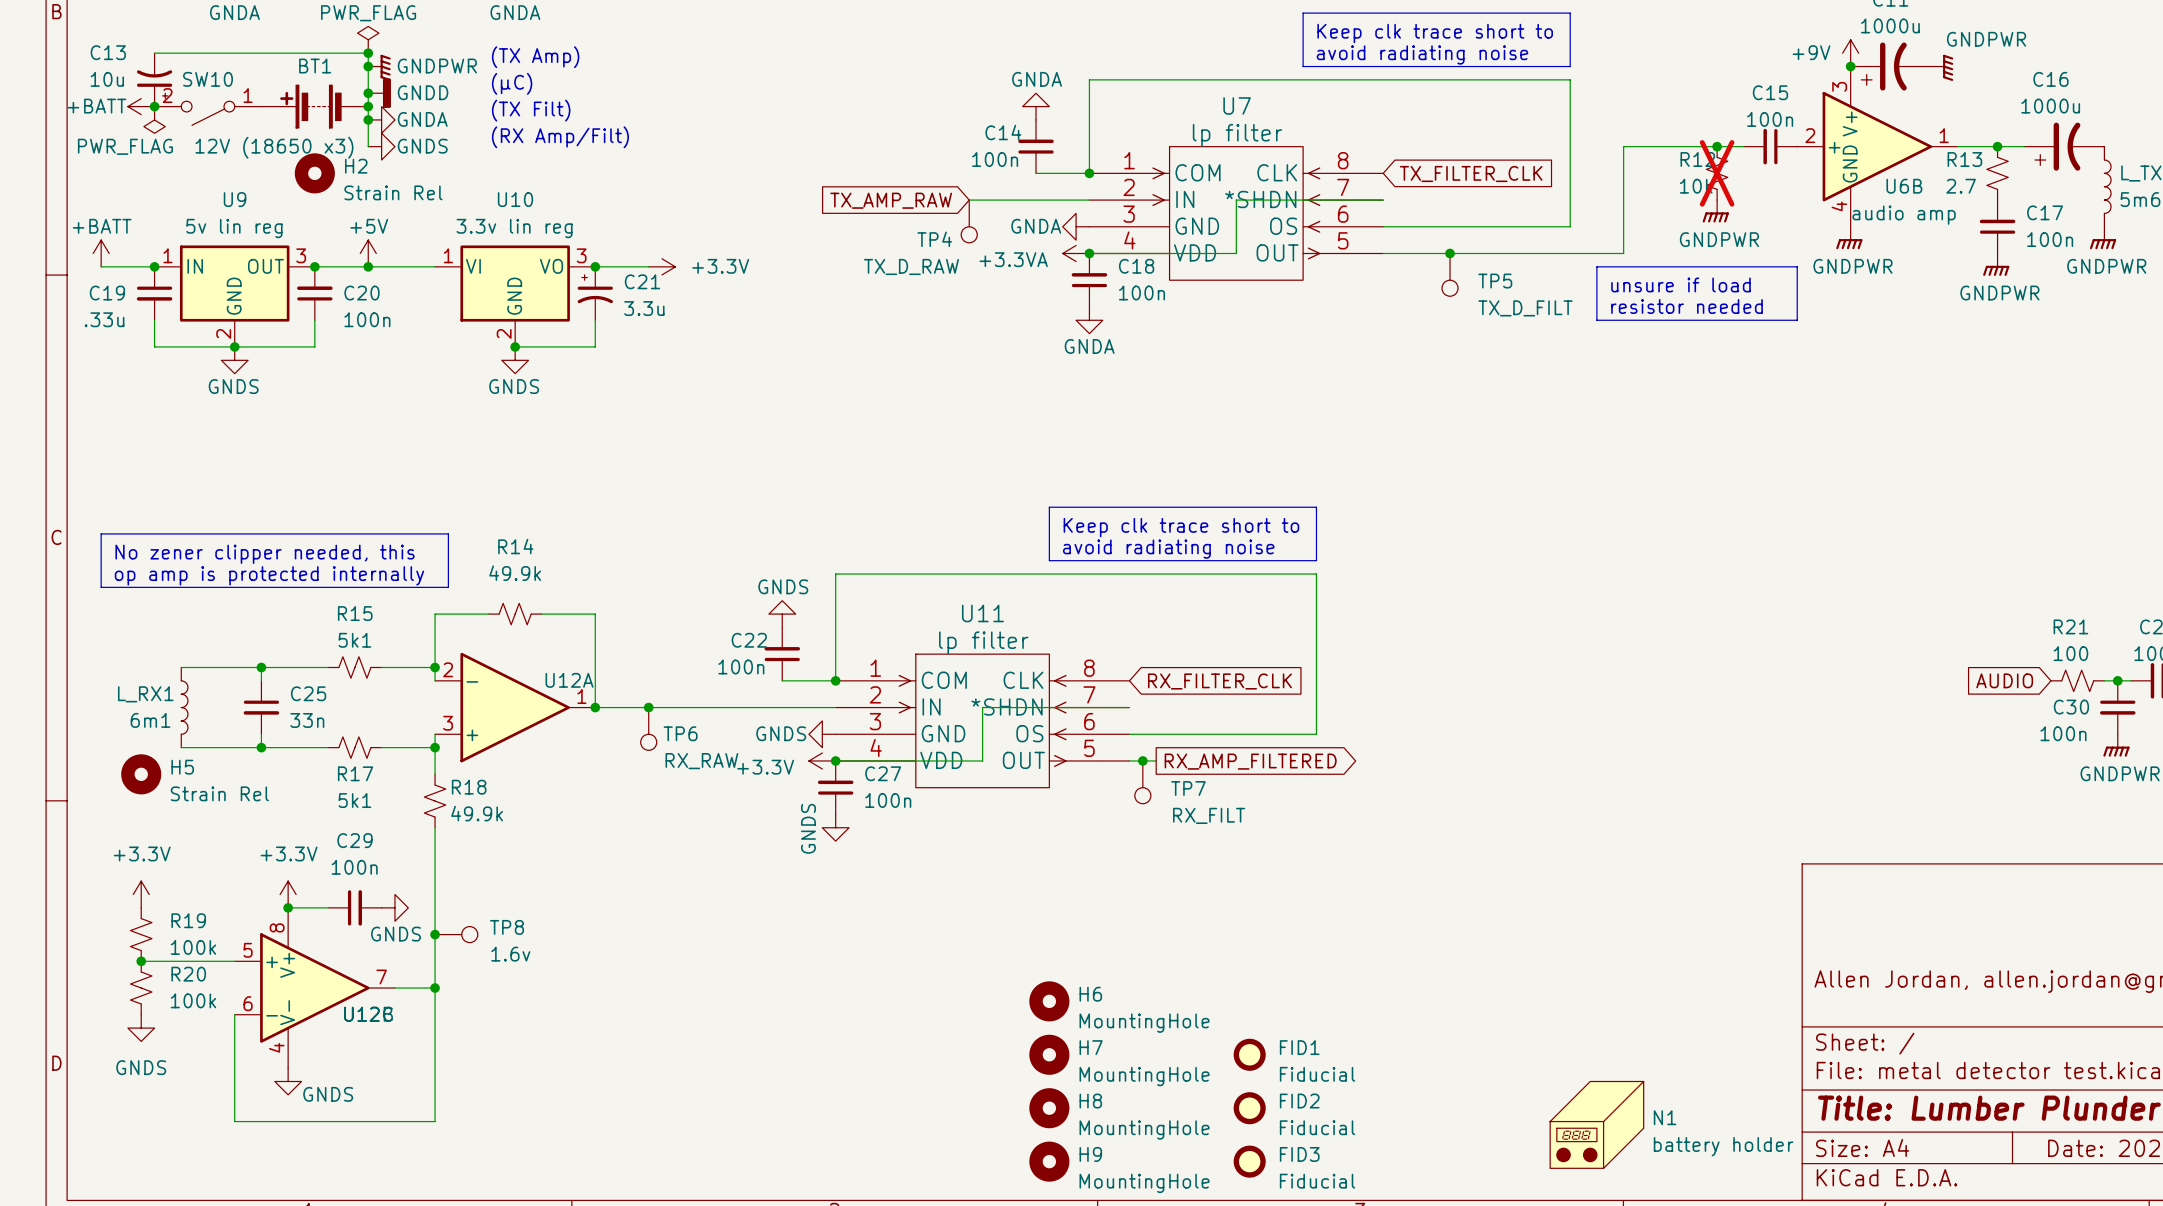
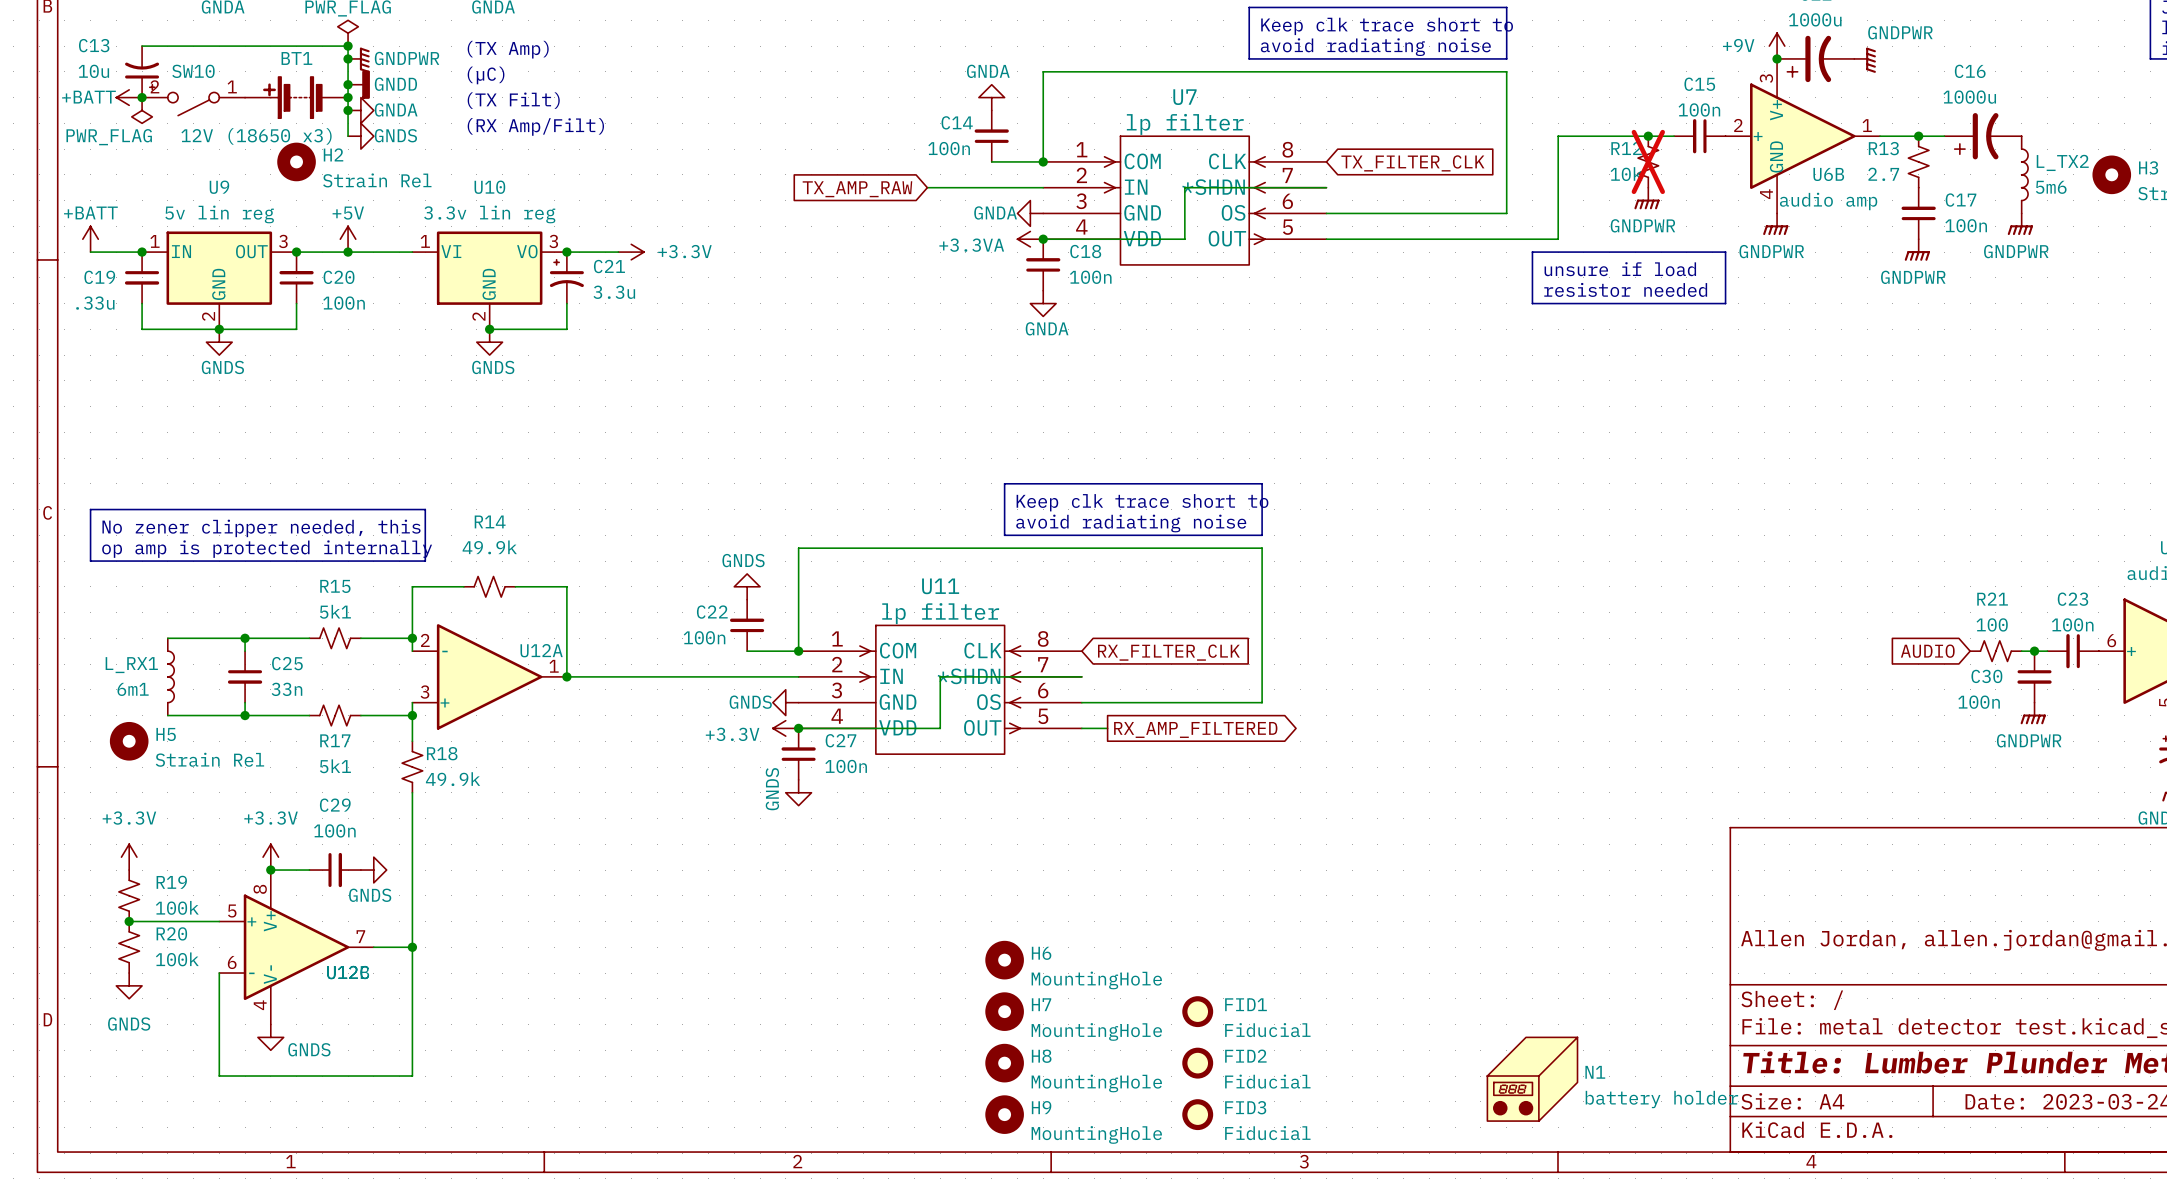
TP4: TX_D_RAW (969, 221) -> none
junction: (1450, 253) -> none
TP5: TX_D_FILT (1450, 274) -> none
junction: (648, 707) -> none
TP6: RX_RAW (648, 728) -> none
junction: (1142, 760) -> none
TP7: RX_FILT (1142, 782) -> none
junction: (435, 934) -> none
TP8: 1.6v (456, 934) -> none

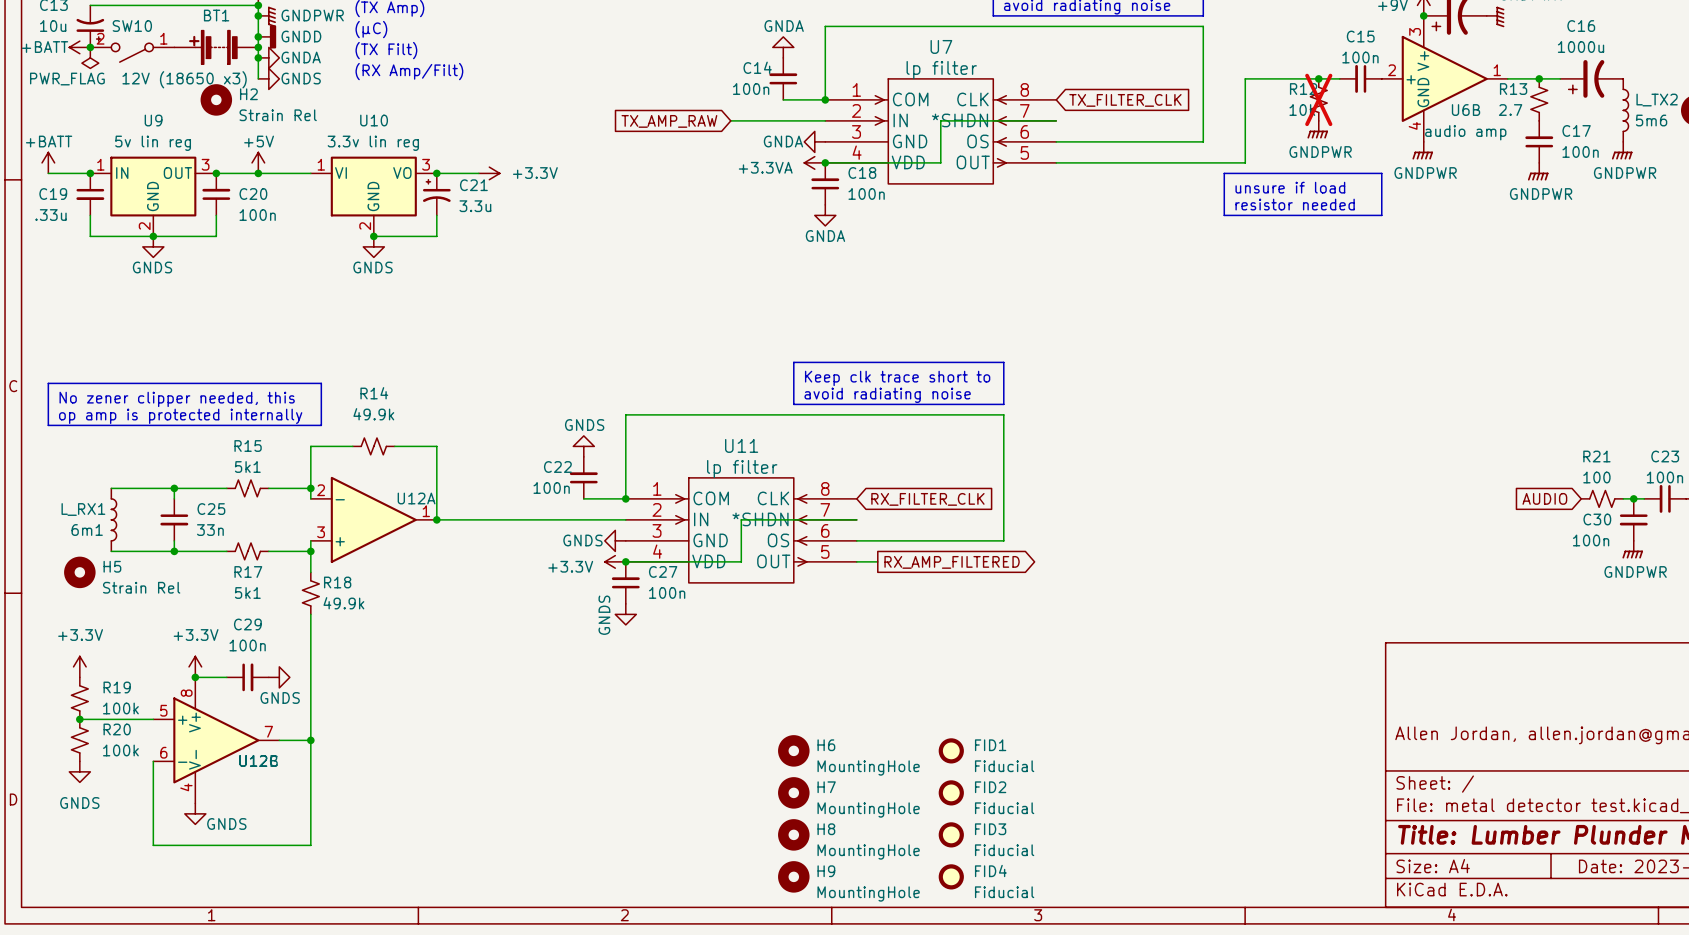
FID1: none -> Fiducial (951, 750)
FID1 name: FID1 (1246, 1004) -> FID2 (990, 787)
FID2 name: FID2 (1245, 1056) -> FID3 (990, 829)
N1: battery holder (1532, 1079) -> none
FID3 name: FID3 (1245, 1107) -> FID4 (990, 870)

